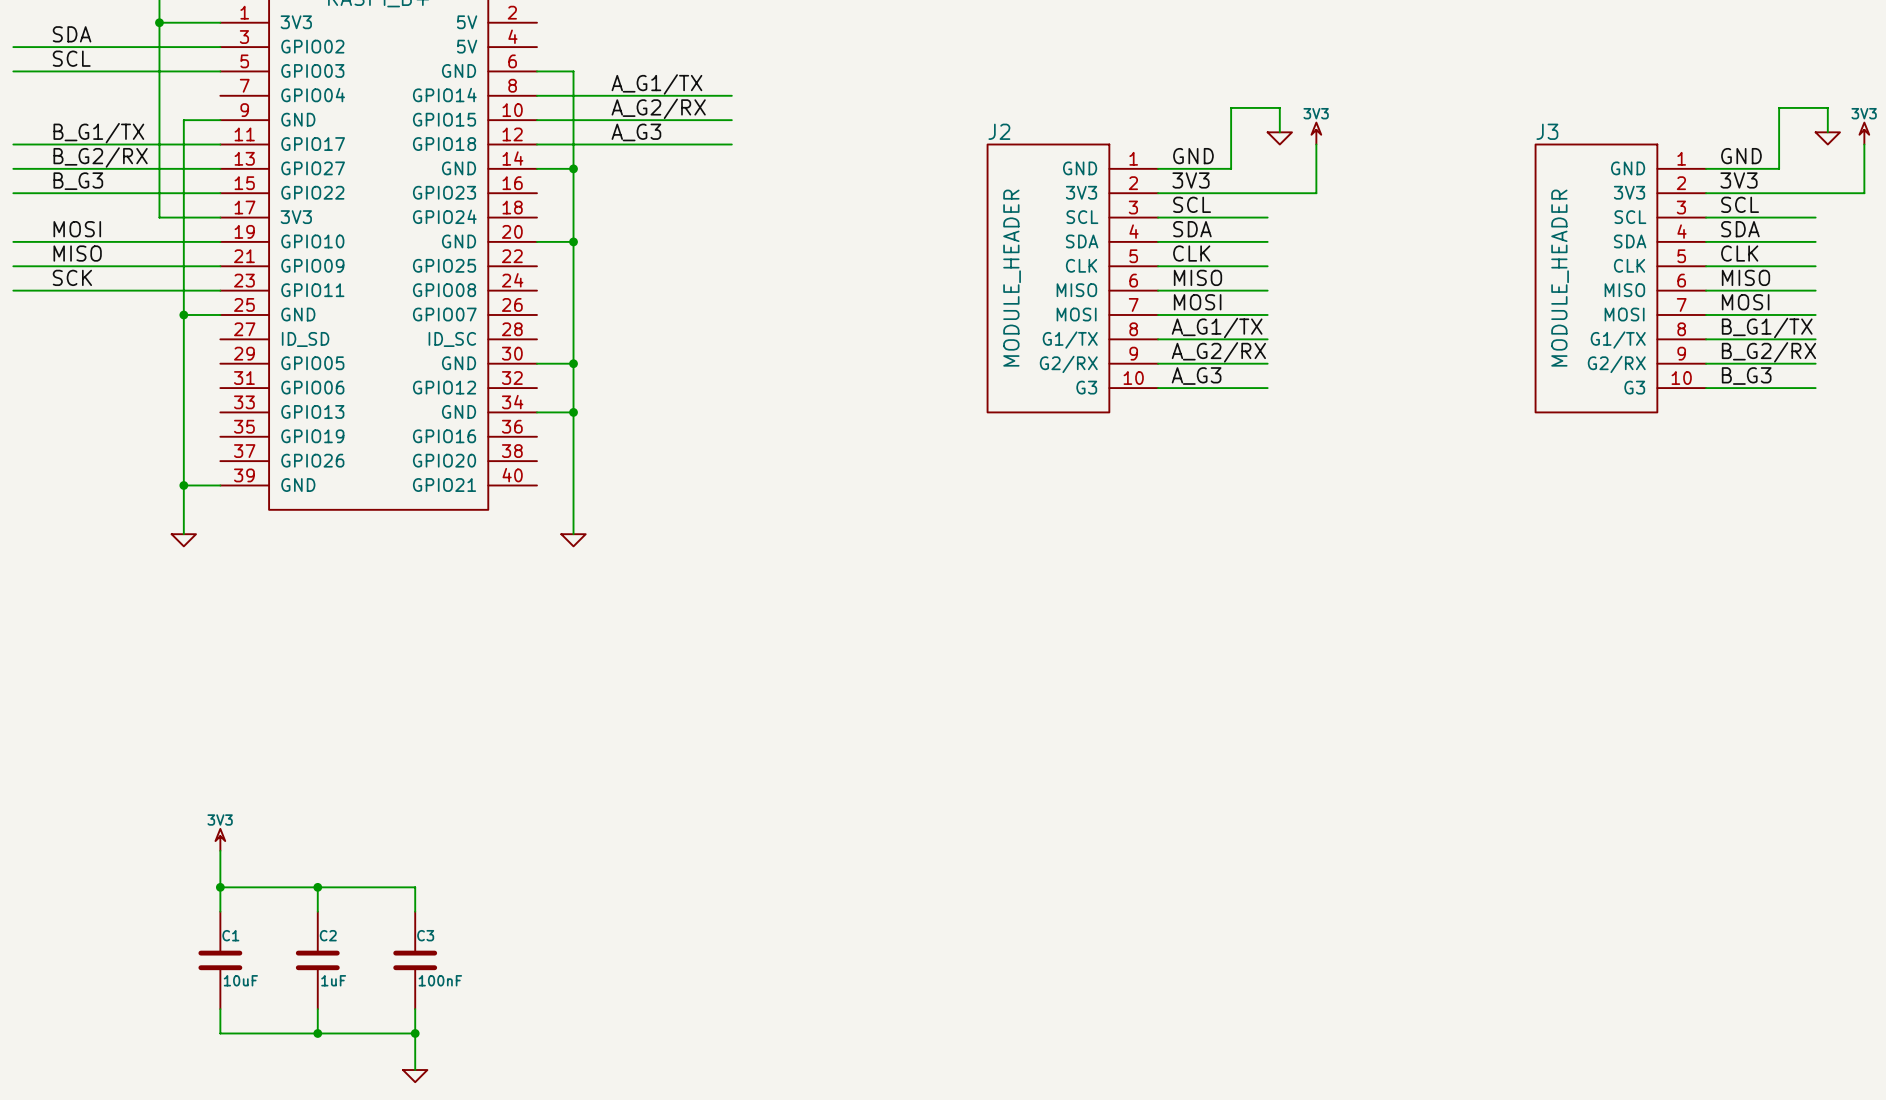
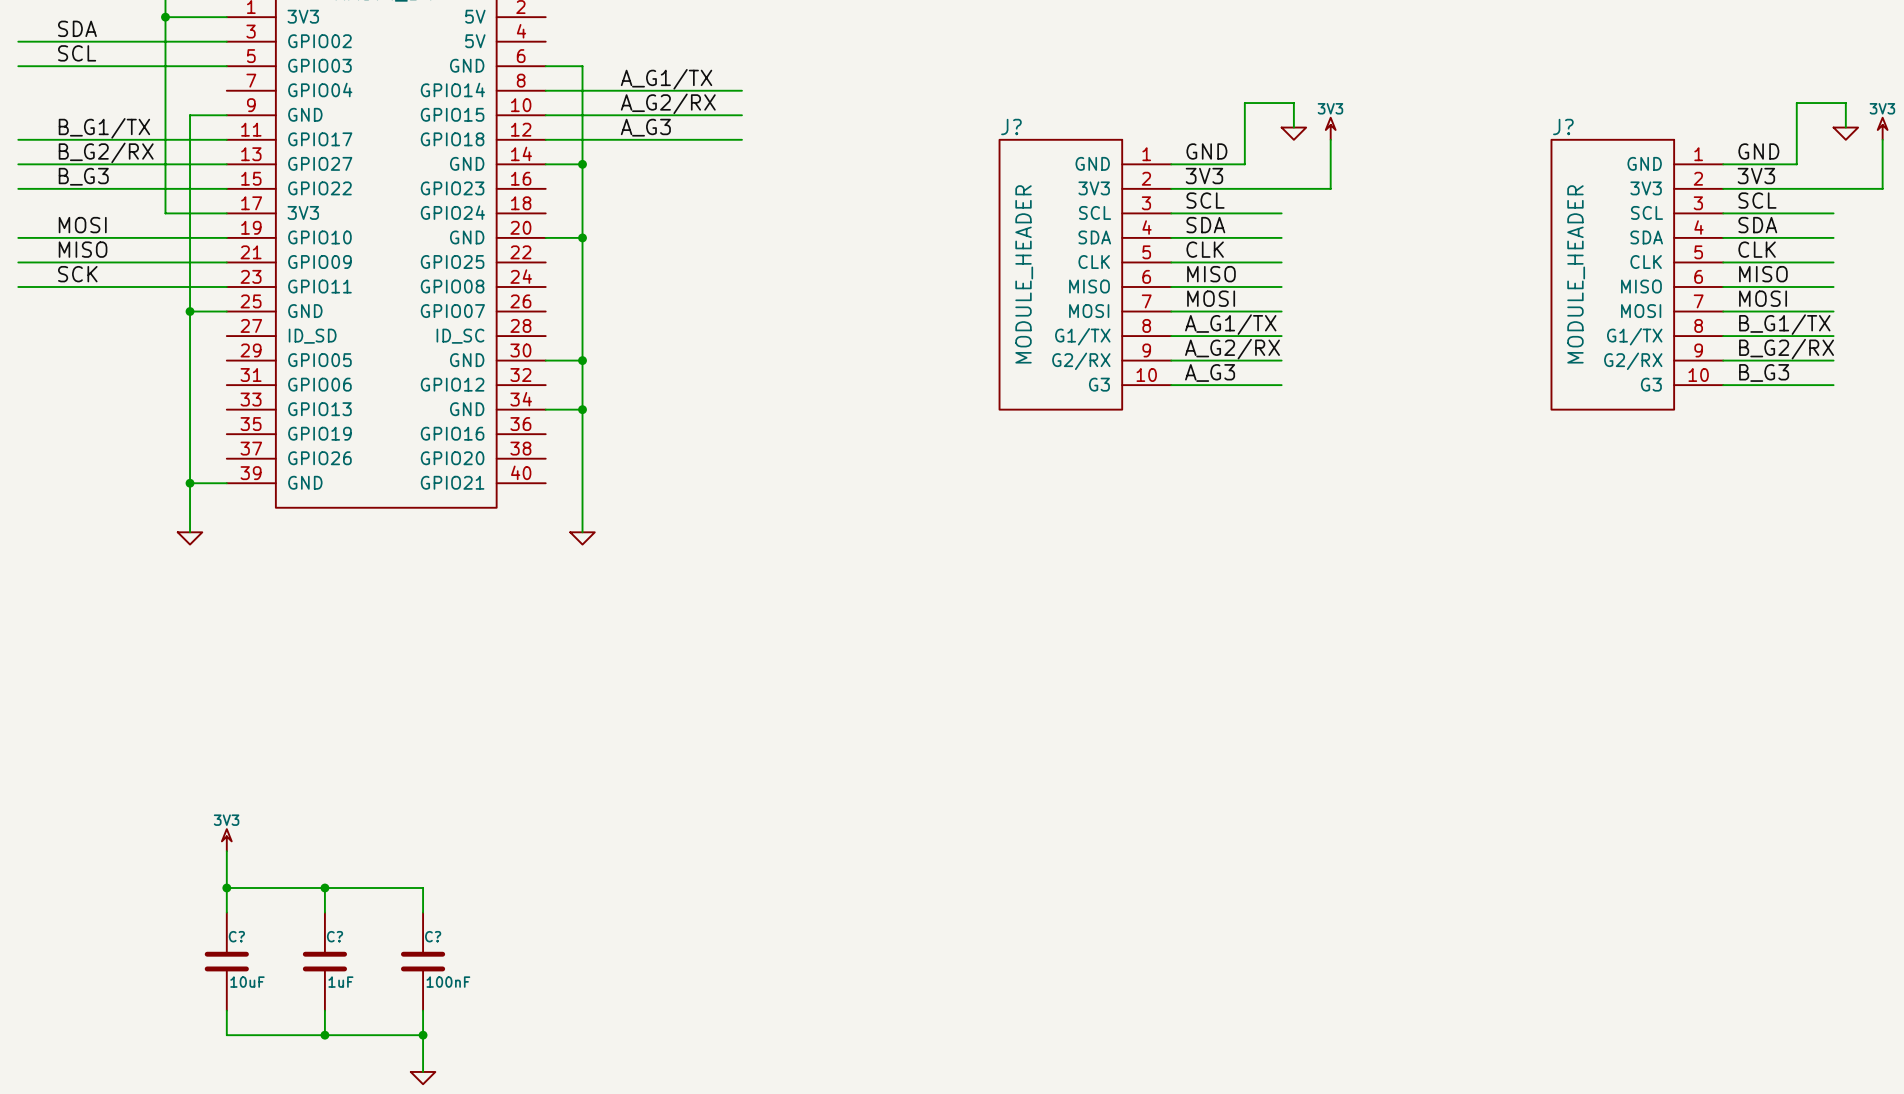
J2 name: J2 (999, 131) -> J? (1011, 126)
J3 name: J3 (1547, 131) -> J? (1563, 126)
C1 name: C1 (230, 935) -> C? (236, 936)
C2 name: C2 (328, 935) -> C? (335, 936)
C3 name: C3 (425, 935) -> C? (433, 936)

